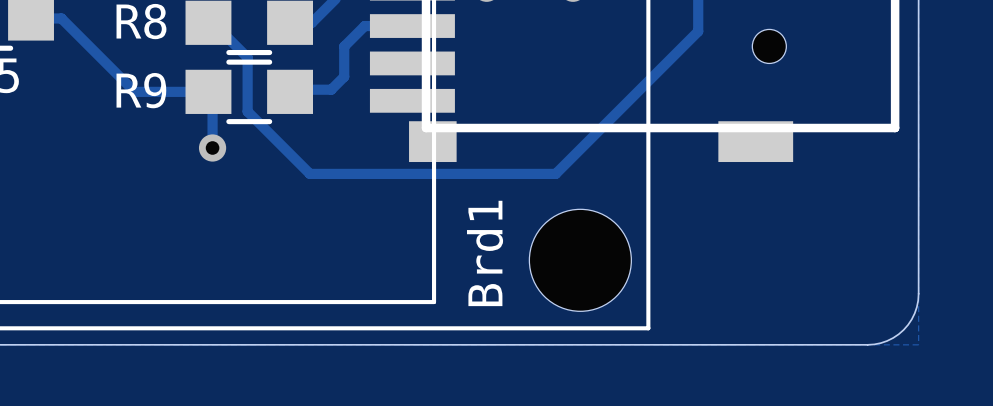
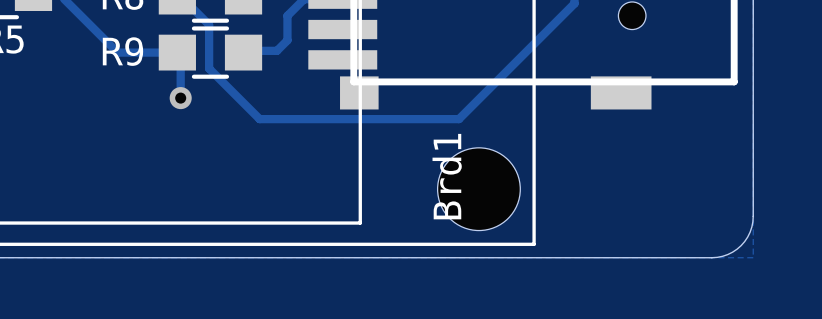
Brd1 name position: Brd1 (485, 253) -> Brd1 (447, 176)

